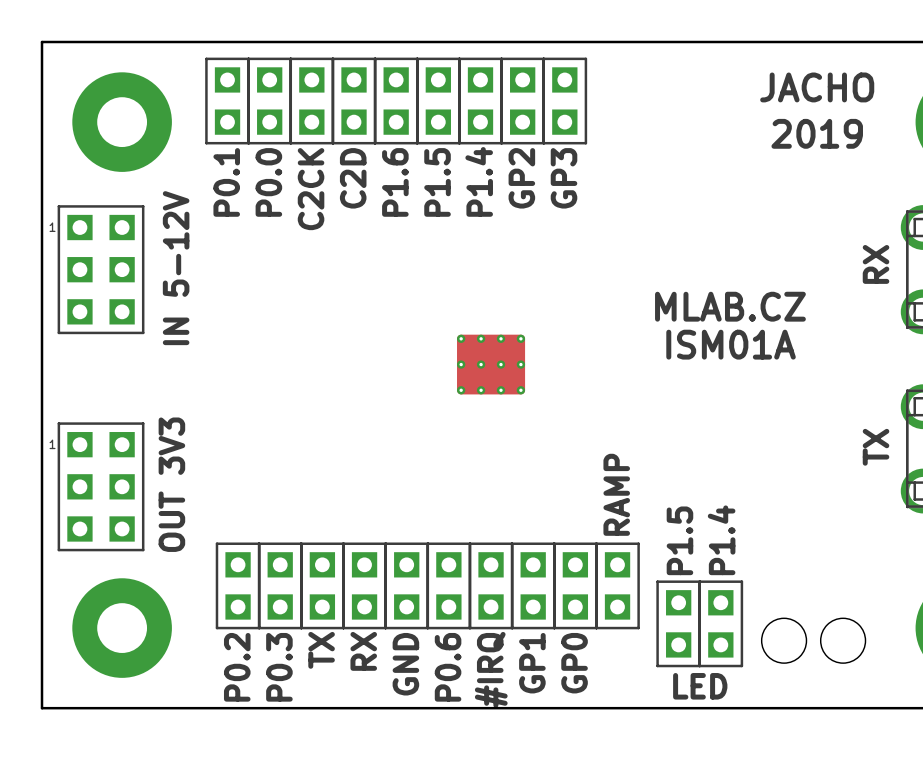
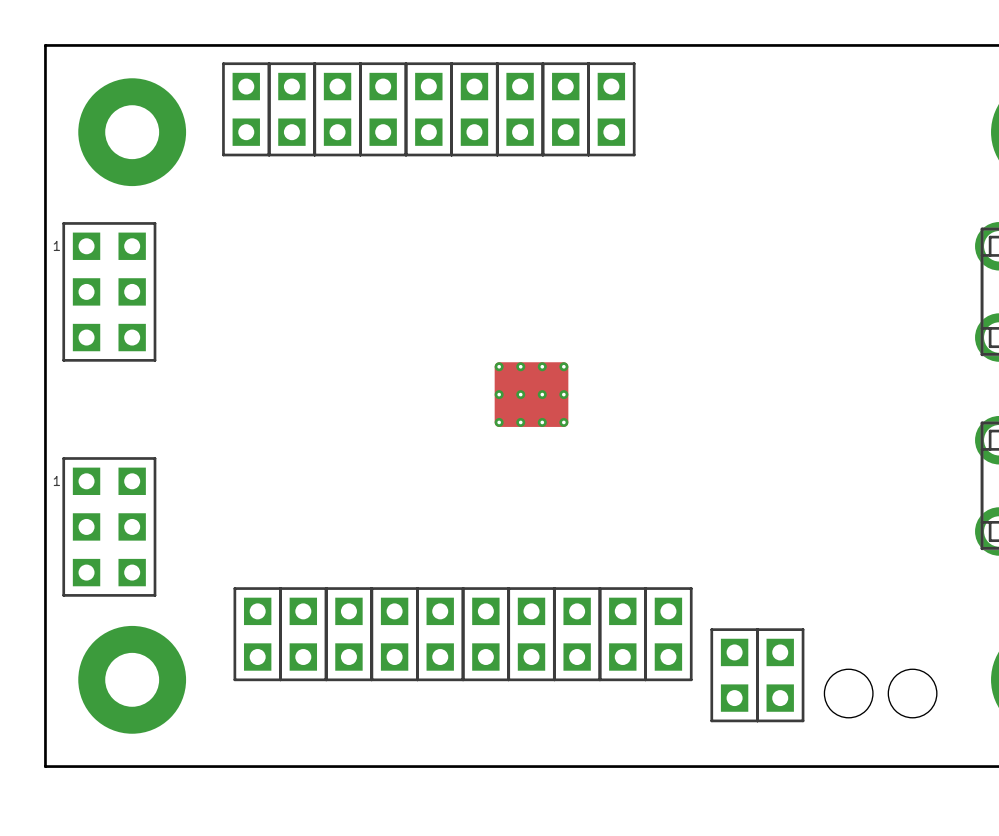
text: JACHO (817, 87) -> none
text: 2019 (817, 133) -> none
text: C2D (353, 178) -> none
text: GP2 (521, 178) -> none
text: GP3 (564, 178) -> none
text: P1.4 (479, 181) -> none
text: P0.1 (226, 182) -> none
text: P0.0 (268, 182) -> none
text: P1.6 (395, 182) -> none
text: P1.5 (437, 182) -> none
text: C2CK (311, 189) -> none
text: RX (876, 264) -> none
text: IN 5-12V (176, 268) -> none
text: MLAB.CZ (730, 306) -> none
text: ISM01A (731, 344) -> none
text: TX (876, 447) -> none
text: OUT 3V3 (171, 484) -> none
text: RAMP (616, 494) -> none
text: P1.5 (679, 540) -> none
text: P1.4 (721, 540) -> none
text: TX (321, 650) -> none
text: RX (363, 651) -> none
text: GP1 (532, 663) -> none
text: GP0 (574, 663) -> none
text: GND (405, 664) -> none
text: P0.2 (237, 667) -> none
text: P0.3 (279, 667) -> none
text: P0.6 (448, 667) -> none
text: #IRQ (491, 669) -> none
text: LED (700, 686) -> none

